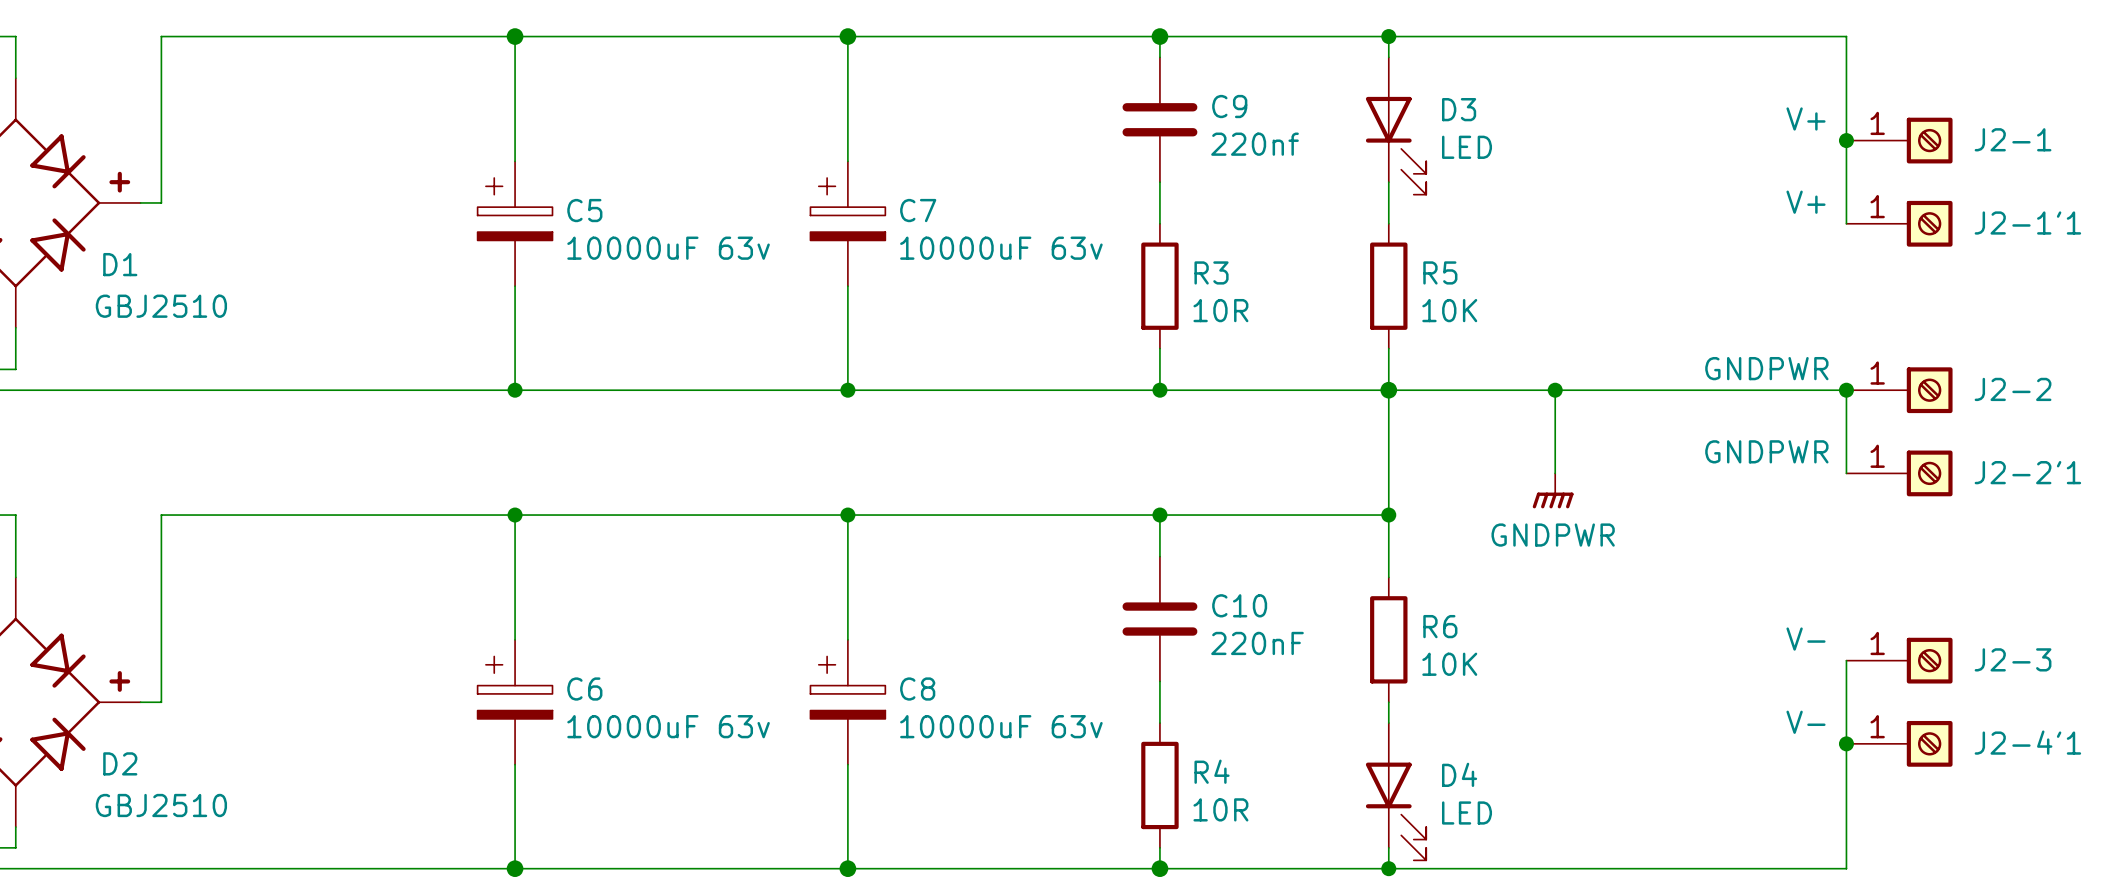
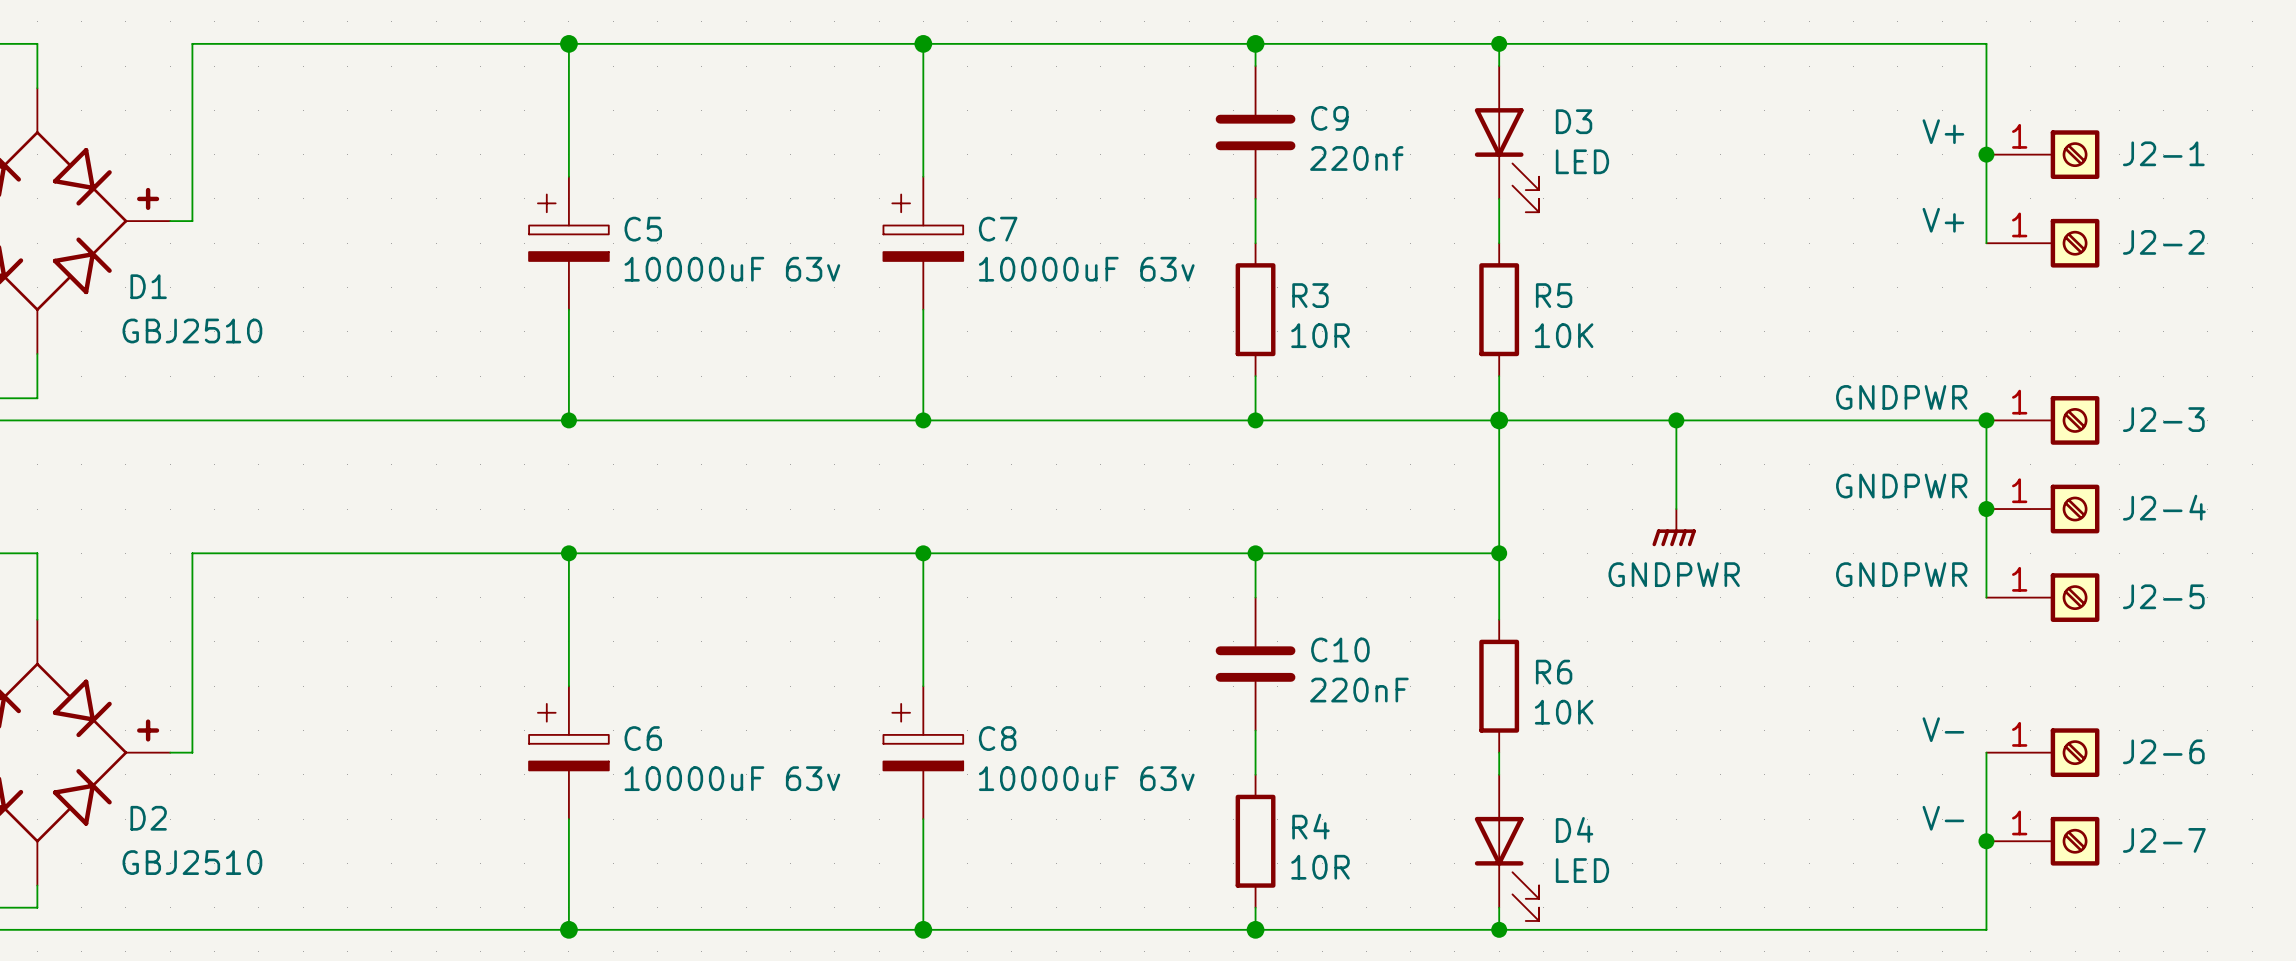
J2-1'1 name: J2-1'1 (2027, 223) -> J2-2 (2163, 242)
J2-2 name: J2-2 (2013, 389) -> J2-3 (2163, 419)
J2-2'1 name: J2-2'1 (2027, 472) -> J2-4 (2164, 507)
wire: none -> (1986, 509) (1986, 597)
junction: none -> (1986, 509)
J2-5: none -> GNDPWR (2042, 597)
wire: (1846, 660) (1846, 702) -> none
J2-3: V- (1899, 660) -> none
J2-6: none -> V- (2042, 752)
junction position: (1846, 743) -> (1986, 841)
J2-4'1: V- (1899, 743) -> none
J2-7: none -> V- (2042, 841)

